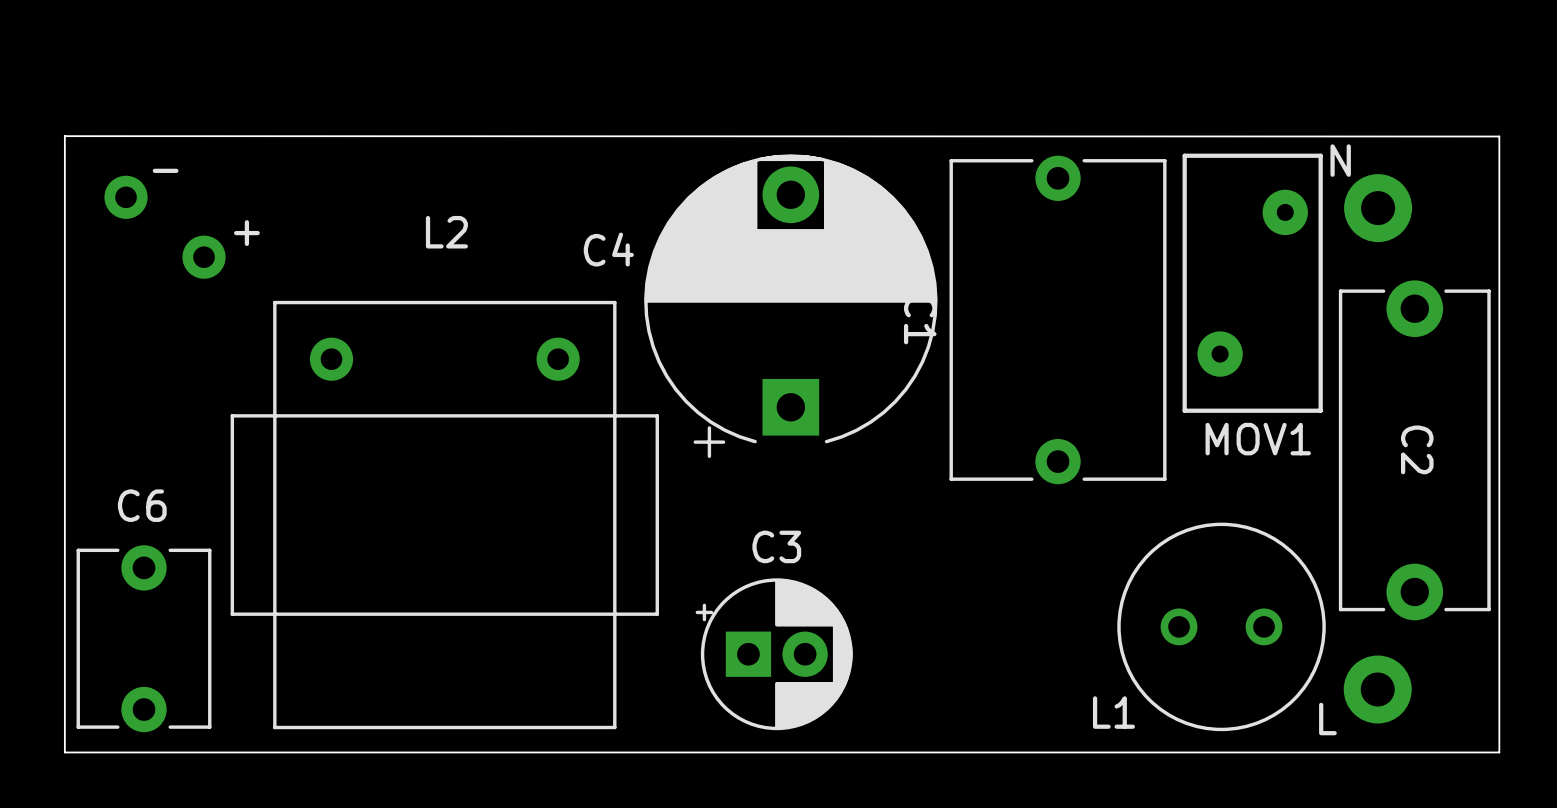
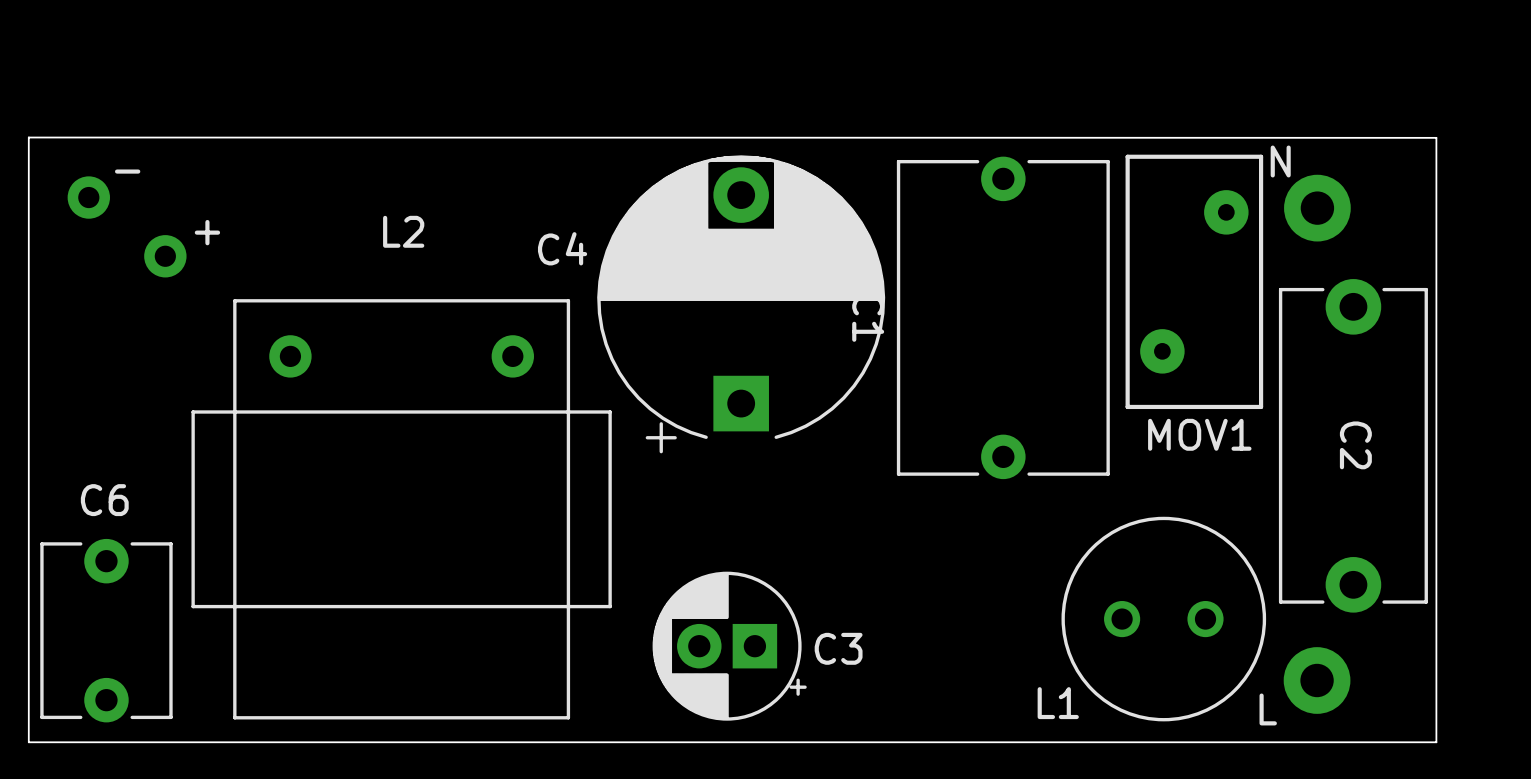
C3 name position: C3 (776, 546) -> C3 (838, 648)
C3 rotation: 0° (774, 654) -> 180° (729, 646)

